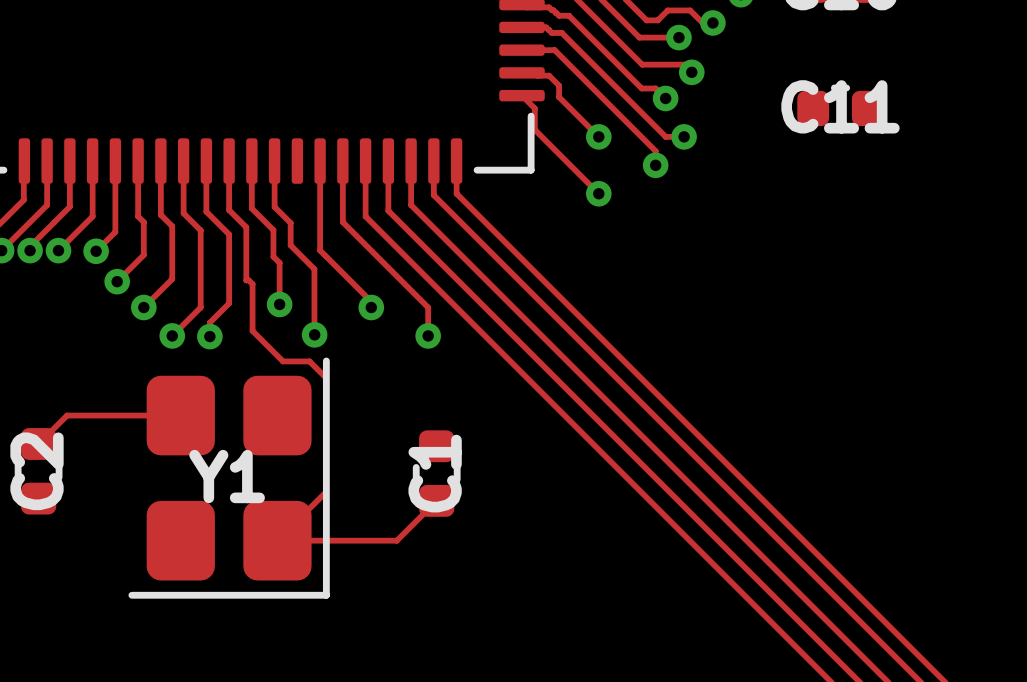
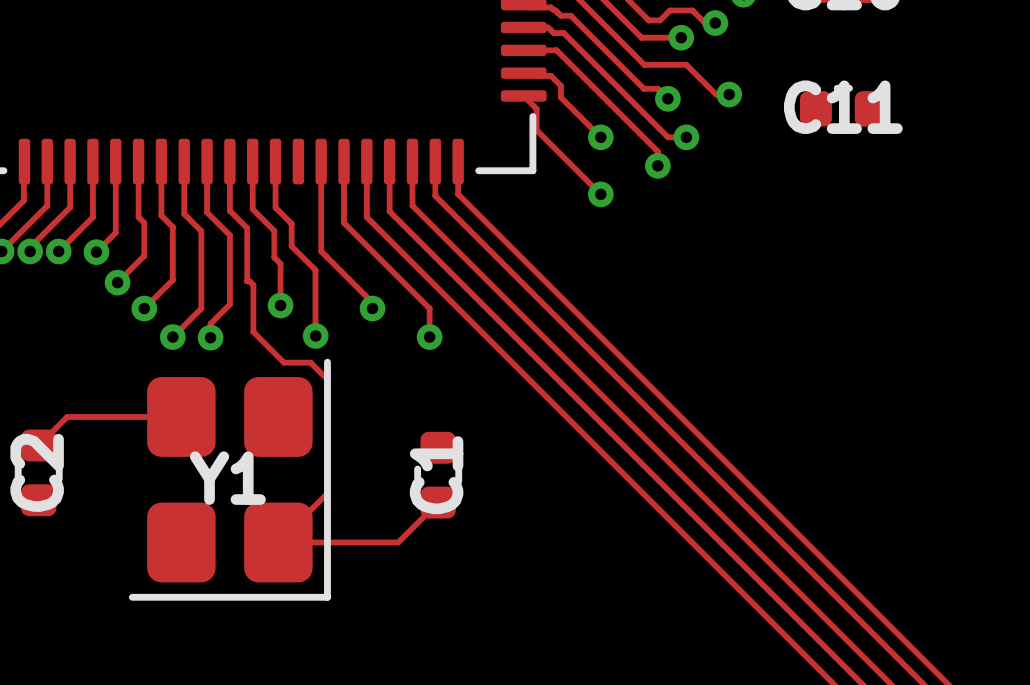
track: none -> (694, 72) (716, 94) (729, 94)
via position: (691, 72) -> (729, 94)

